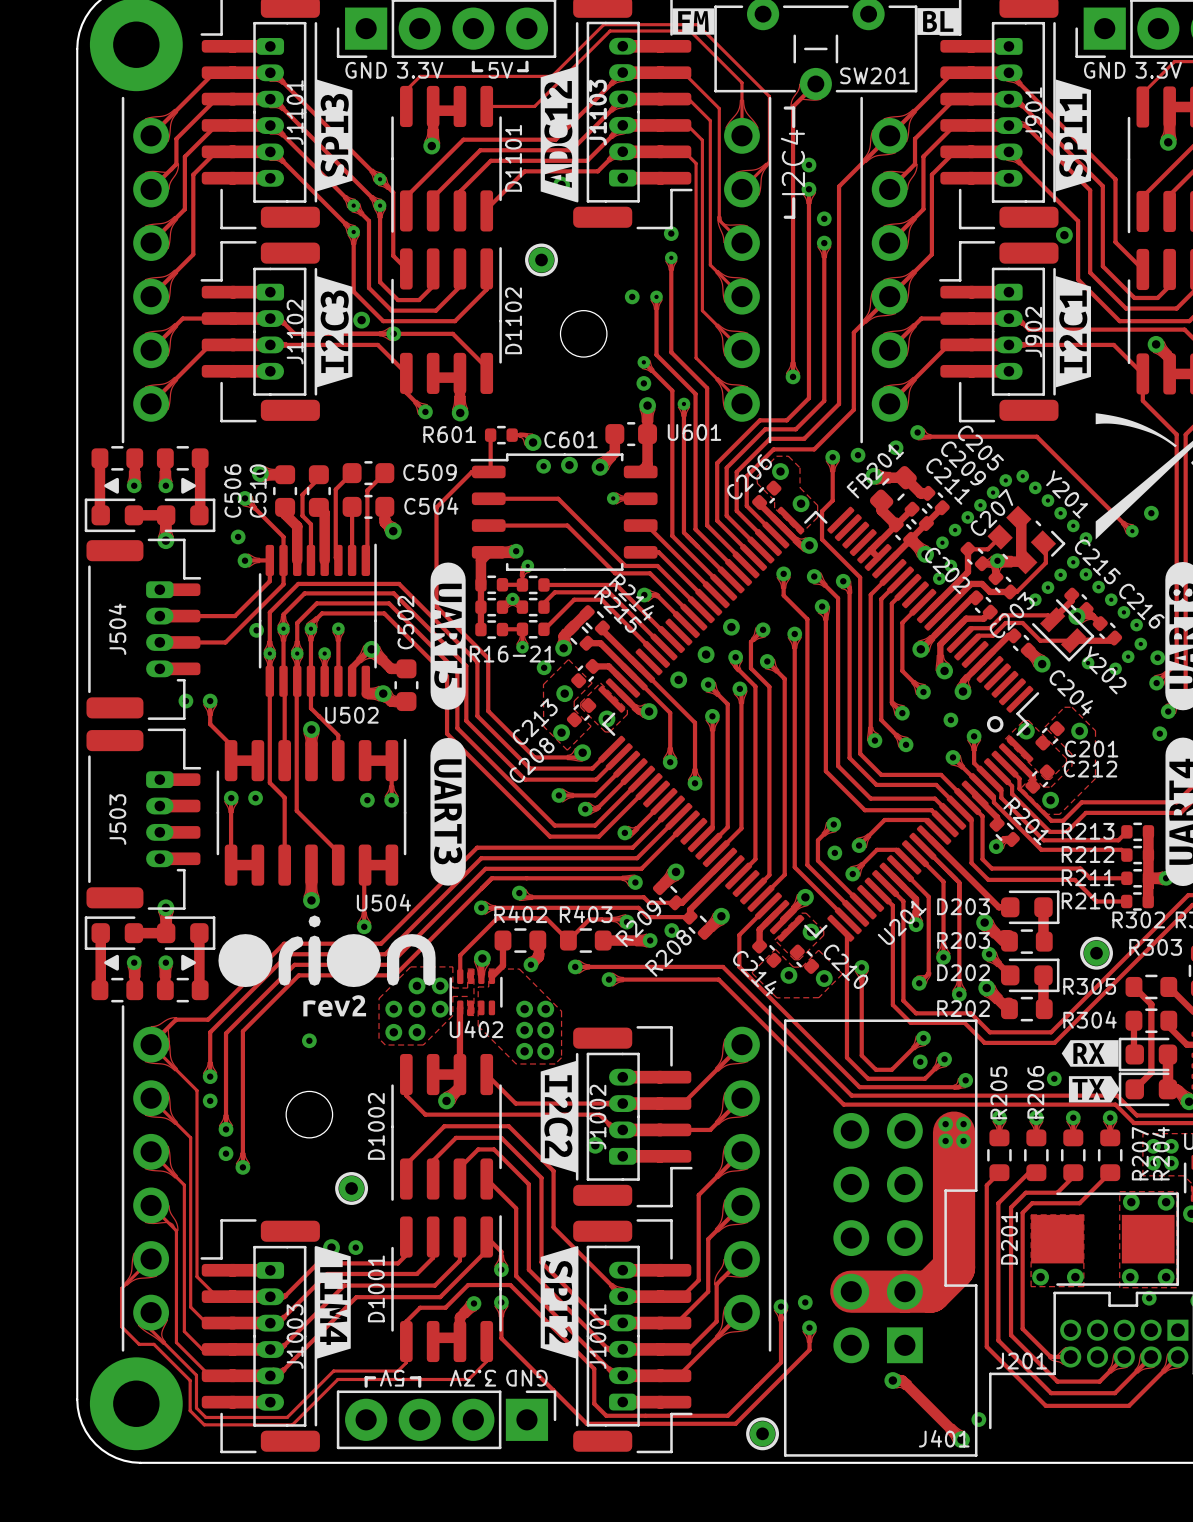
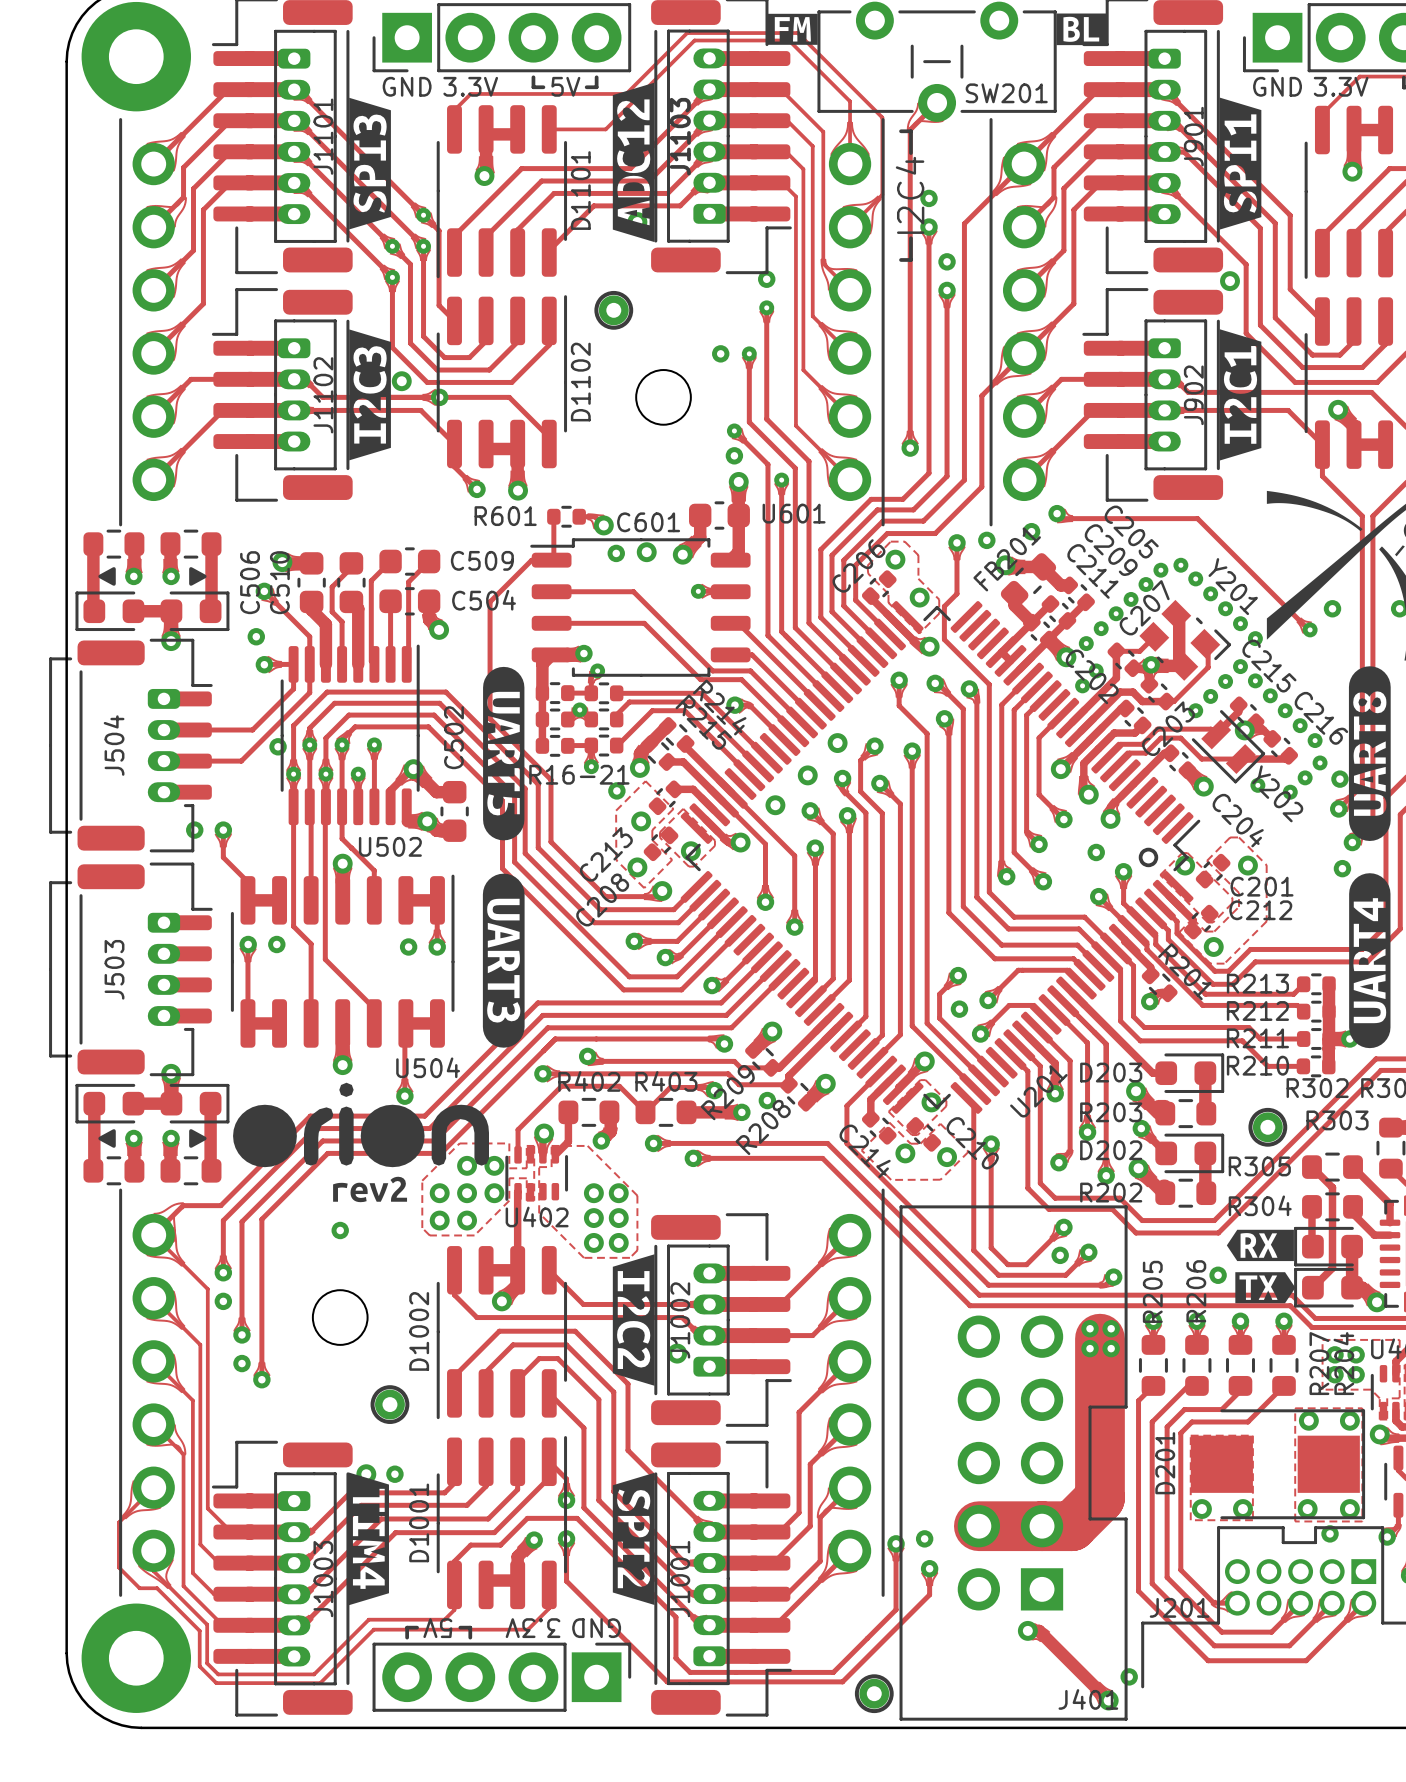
J504 footprint: [86, 538, 202, 720] -> [49, 638, 213, 853]
J503 footprint: [86, 728, 202, 910] -> [49, 862, 213, 1077]

